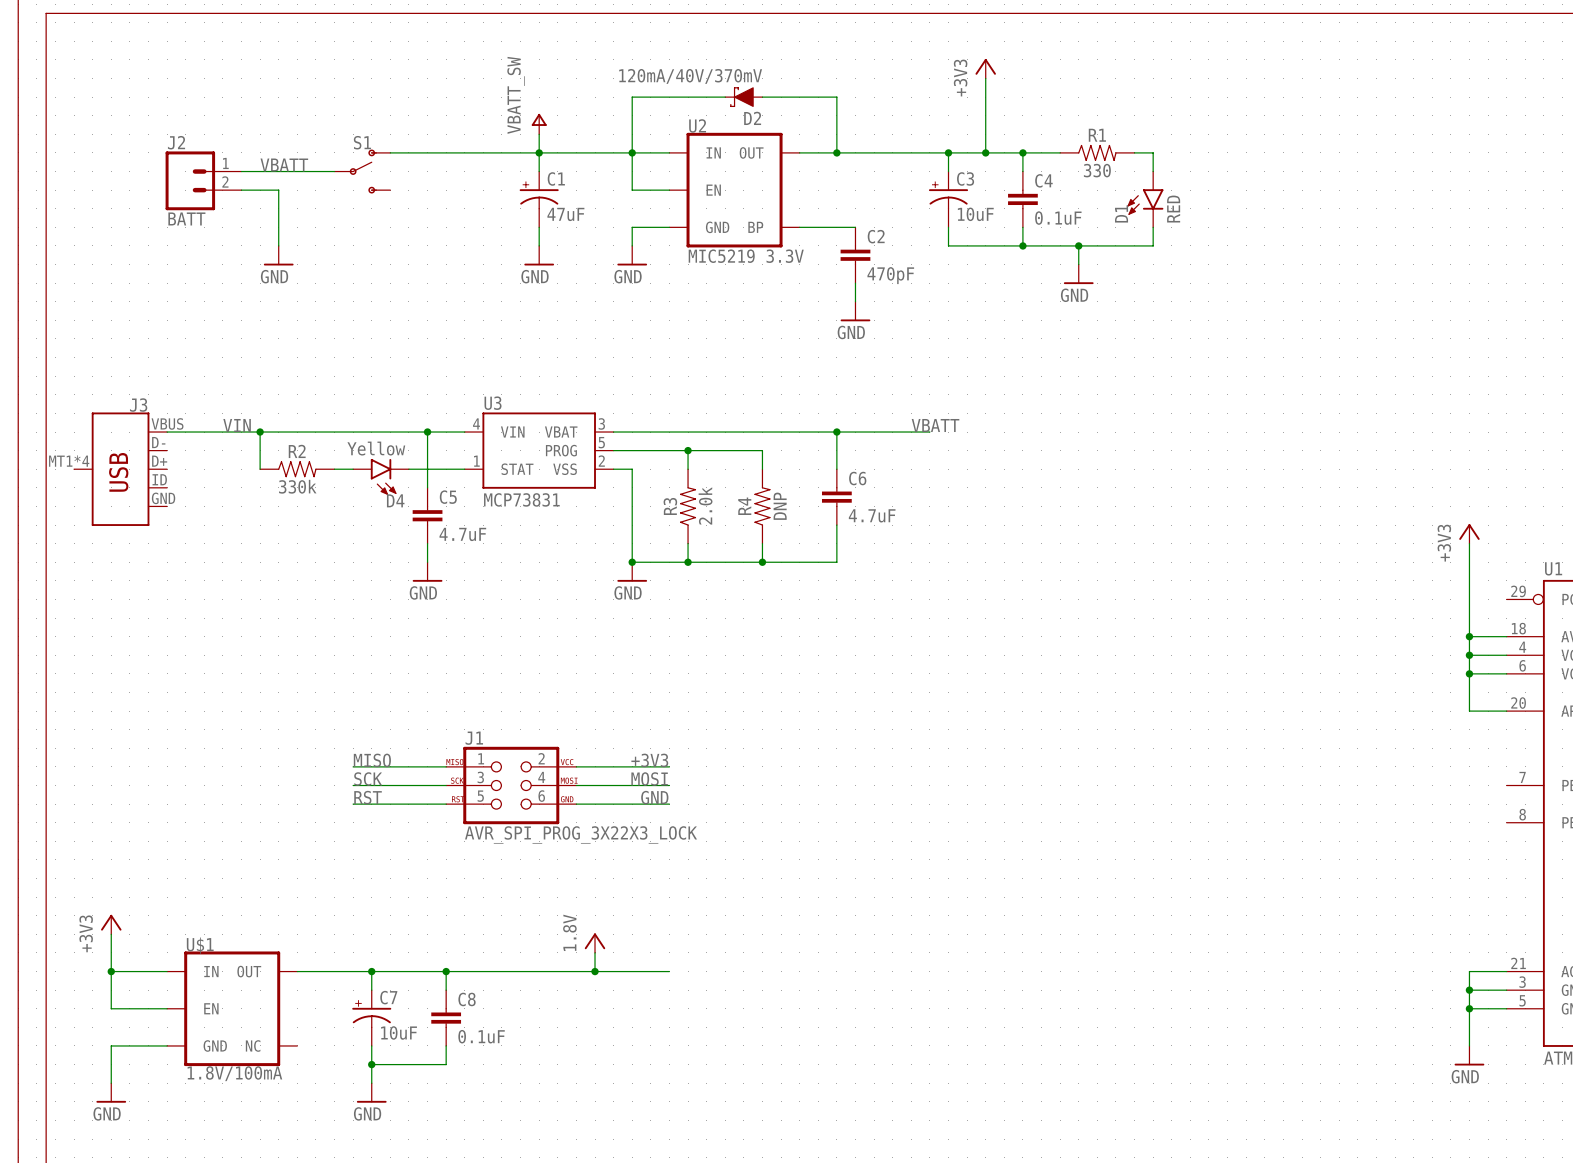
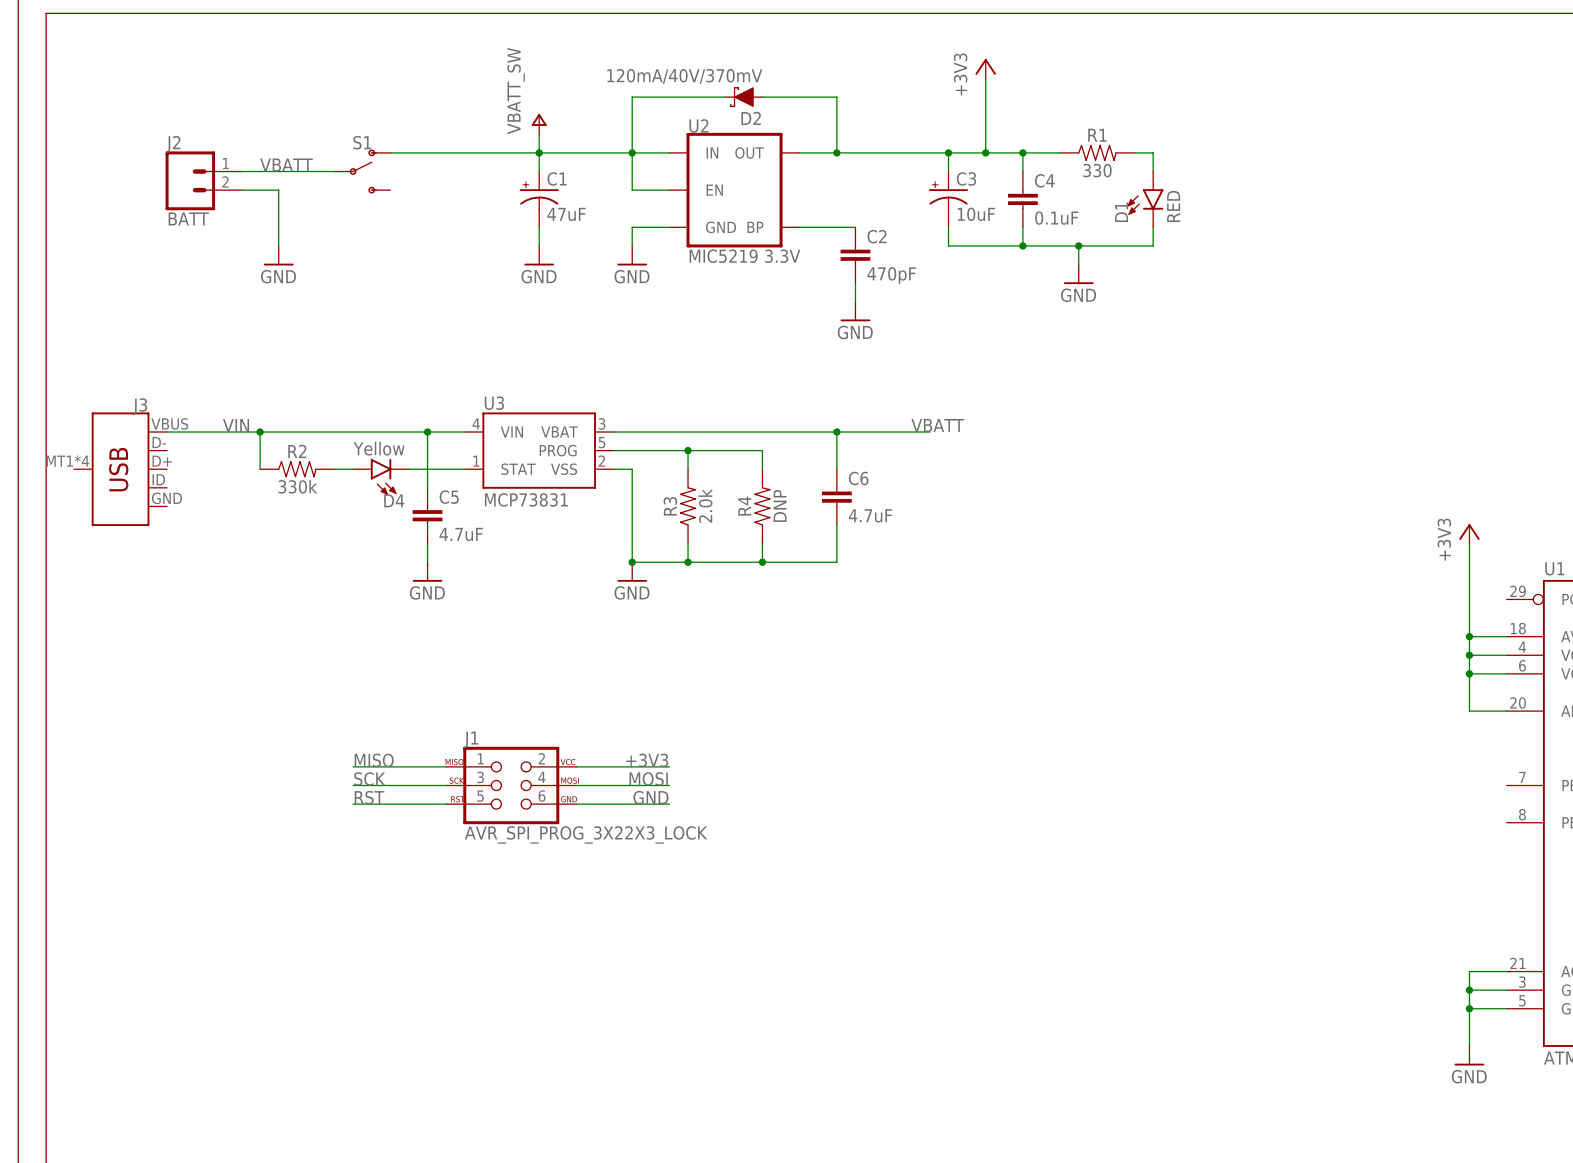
power symbol: +3V3 (111, 924) -> none
wire: (111, 934) (111, 1008) (167, 1008) -> none
power symbol: 1.8V (595, 943) -> none
wire: (595, 952) (595, 971) -> none
wire: (111, 971) (167, 971) -> none
junction: (111, 971) -> none
wire: (297, 971) (669, 971) -> none
wire: (371, 971) (371, 990) -> none
junction: (371, 971) -> none
wire: (446, 971) (446, 990) -> none
junction: (446, 971) -> none
junction: (595, 971) -> none
U$1: 1.8V/100mA (232, 1008) -> none
C7: 10uF (371, 1018) -> none
C8: 0.1uF (446, 1018) -> none
wire: (167, 1045) (111, 1045) (111, 1083) -> none
wire: (371, 1045) (371, 1083) -> none
wire: (446, 1045) (446, 1064) (371, 1064) -> none
junction: (371, 1064) -> none
power symbol: GND (111, 1092) -> none
power symbol: GND (371, 1092) -> none

